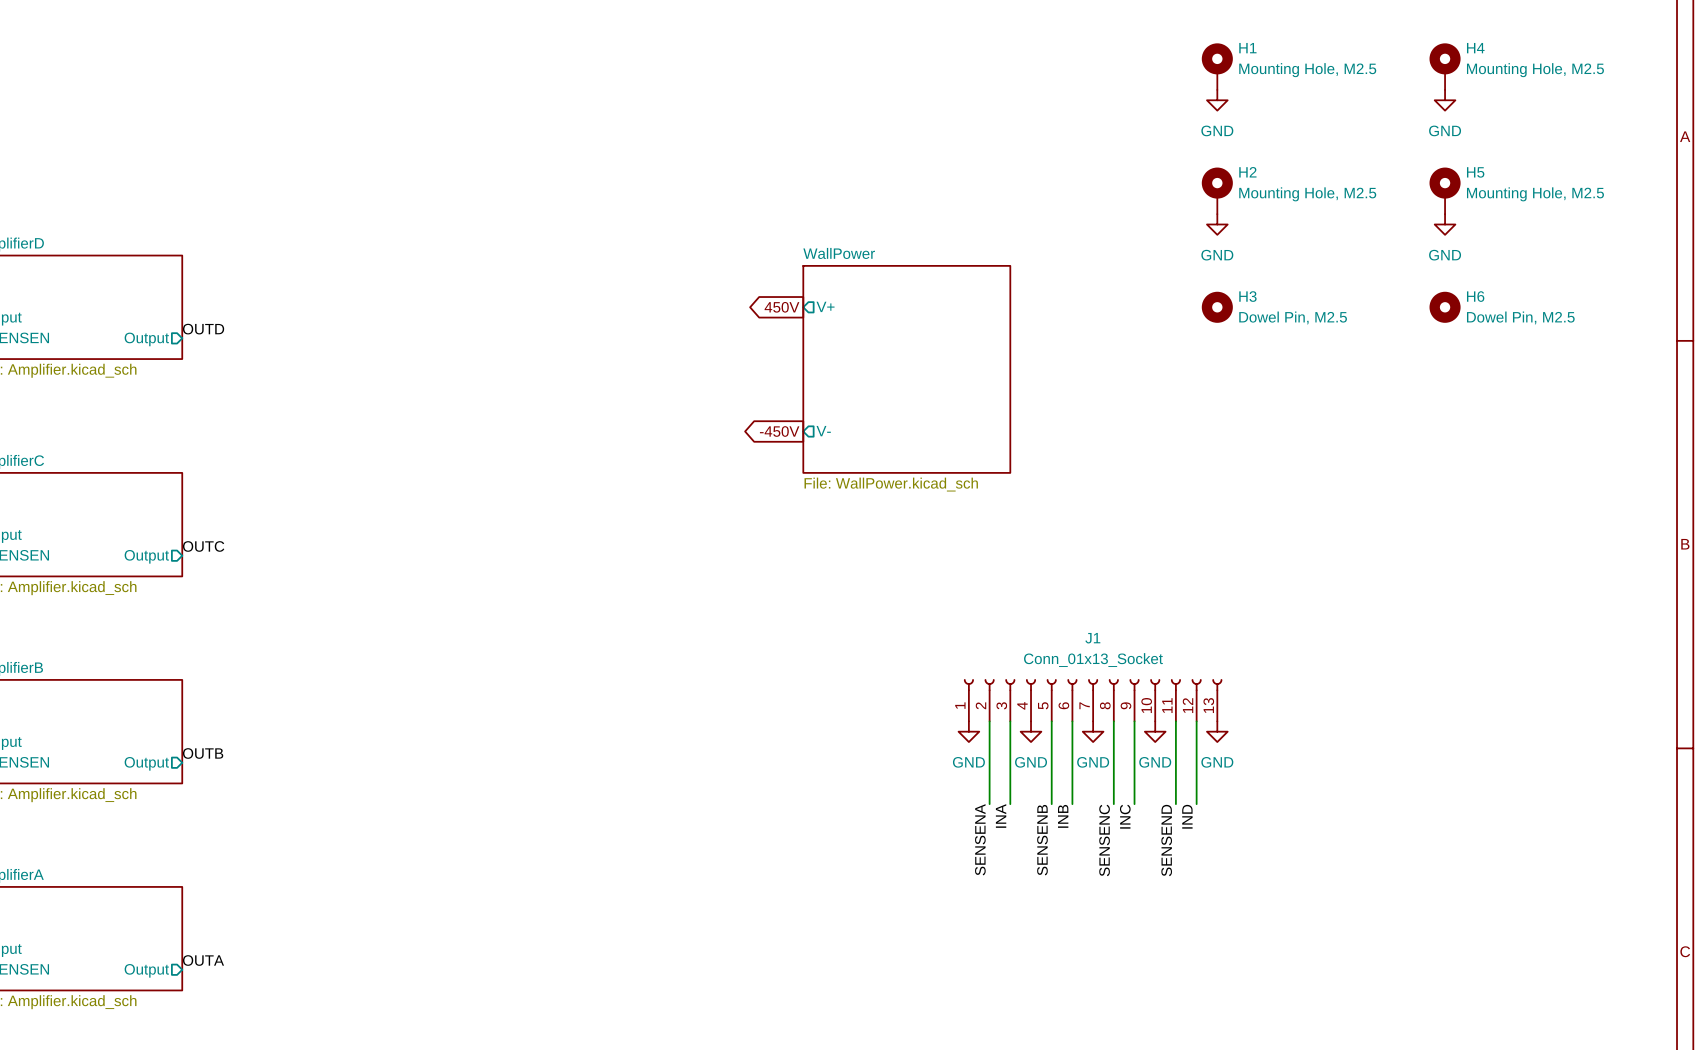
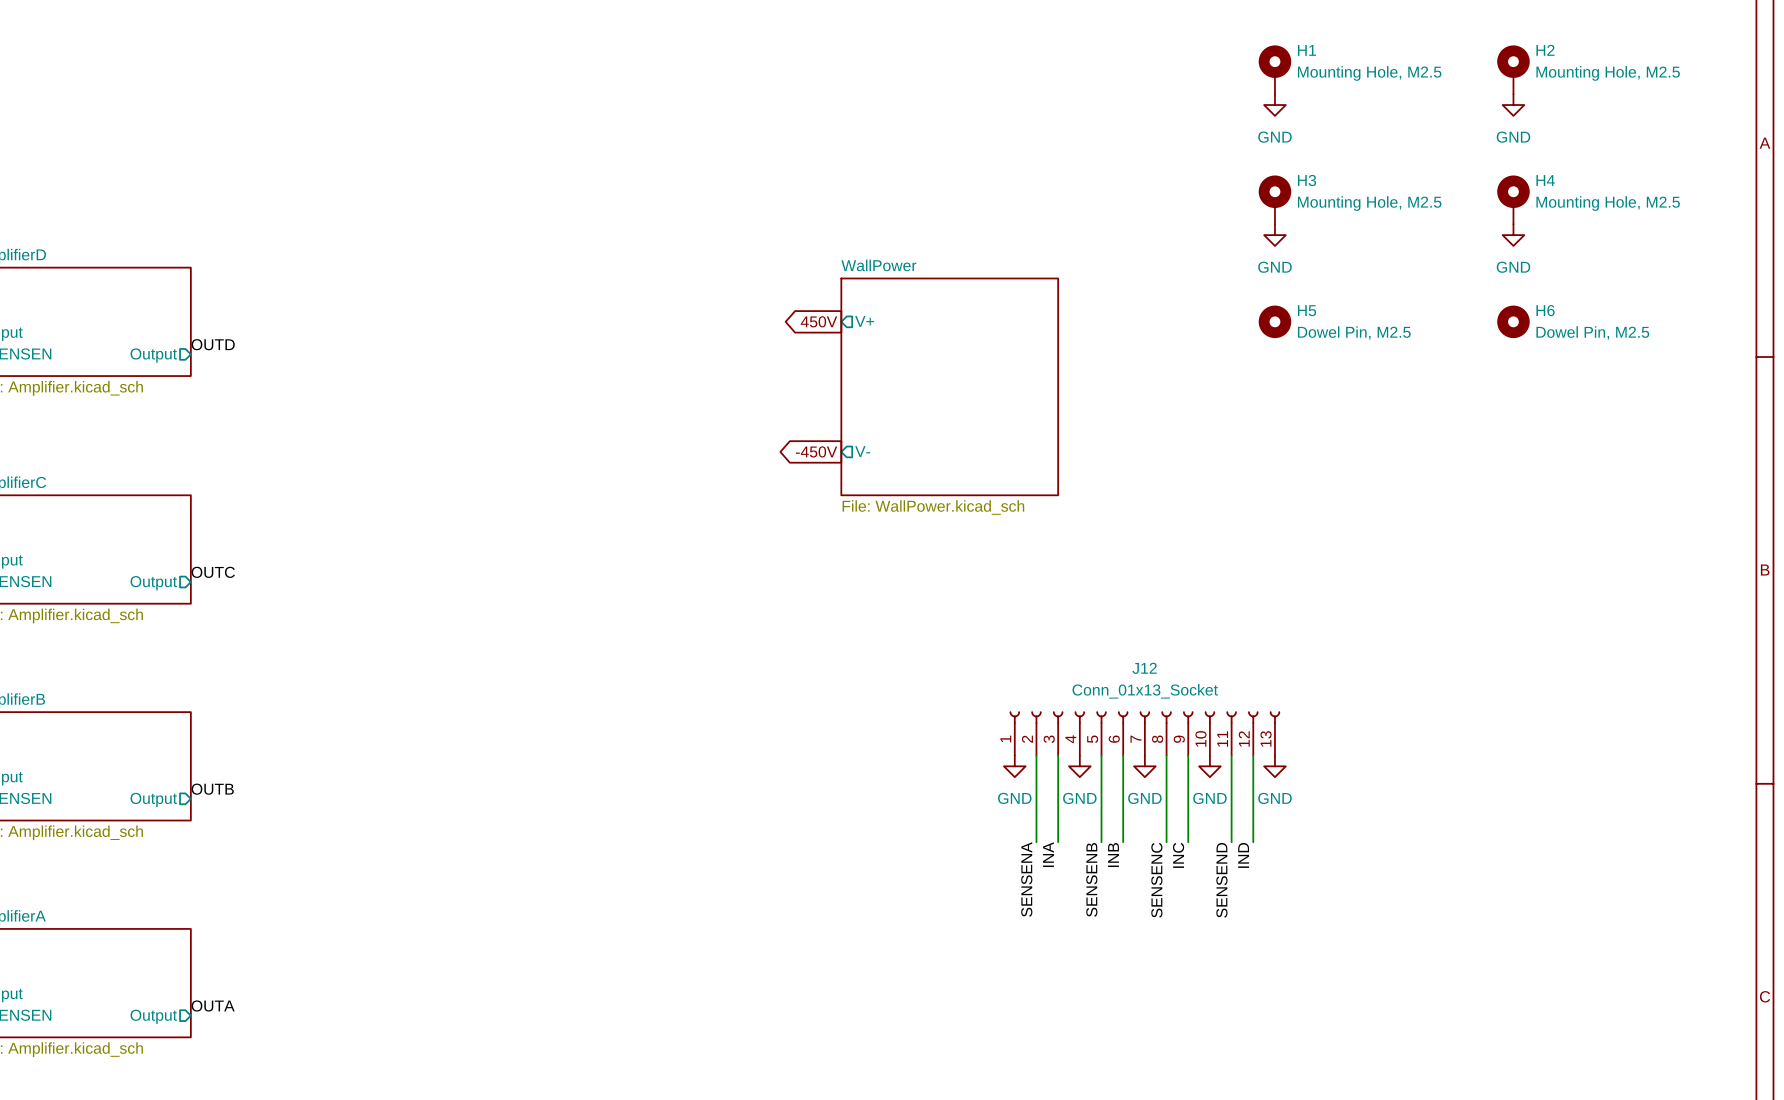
H4 name: H4 (1475, 48) -> H2 (1545, 50)
H2 name: H2 (1247, 172) -> H3 (1307, 180)
H5 name: H5 (1475, 172) -> H4 (1545, 180)
H3 name: H3 (1247, 296) -> H5 (1307, 310)
J1 name: J1 (1092, 638) -> J12 (1144, 668)

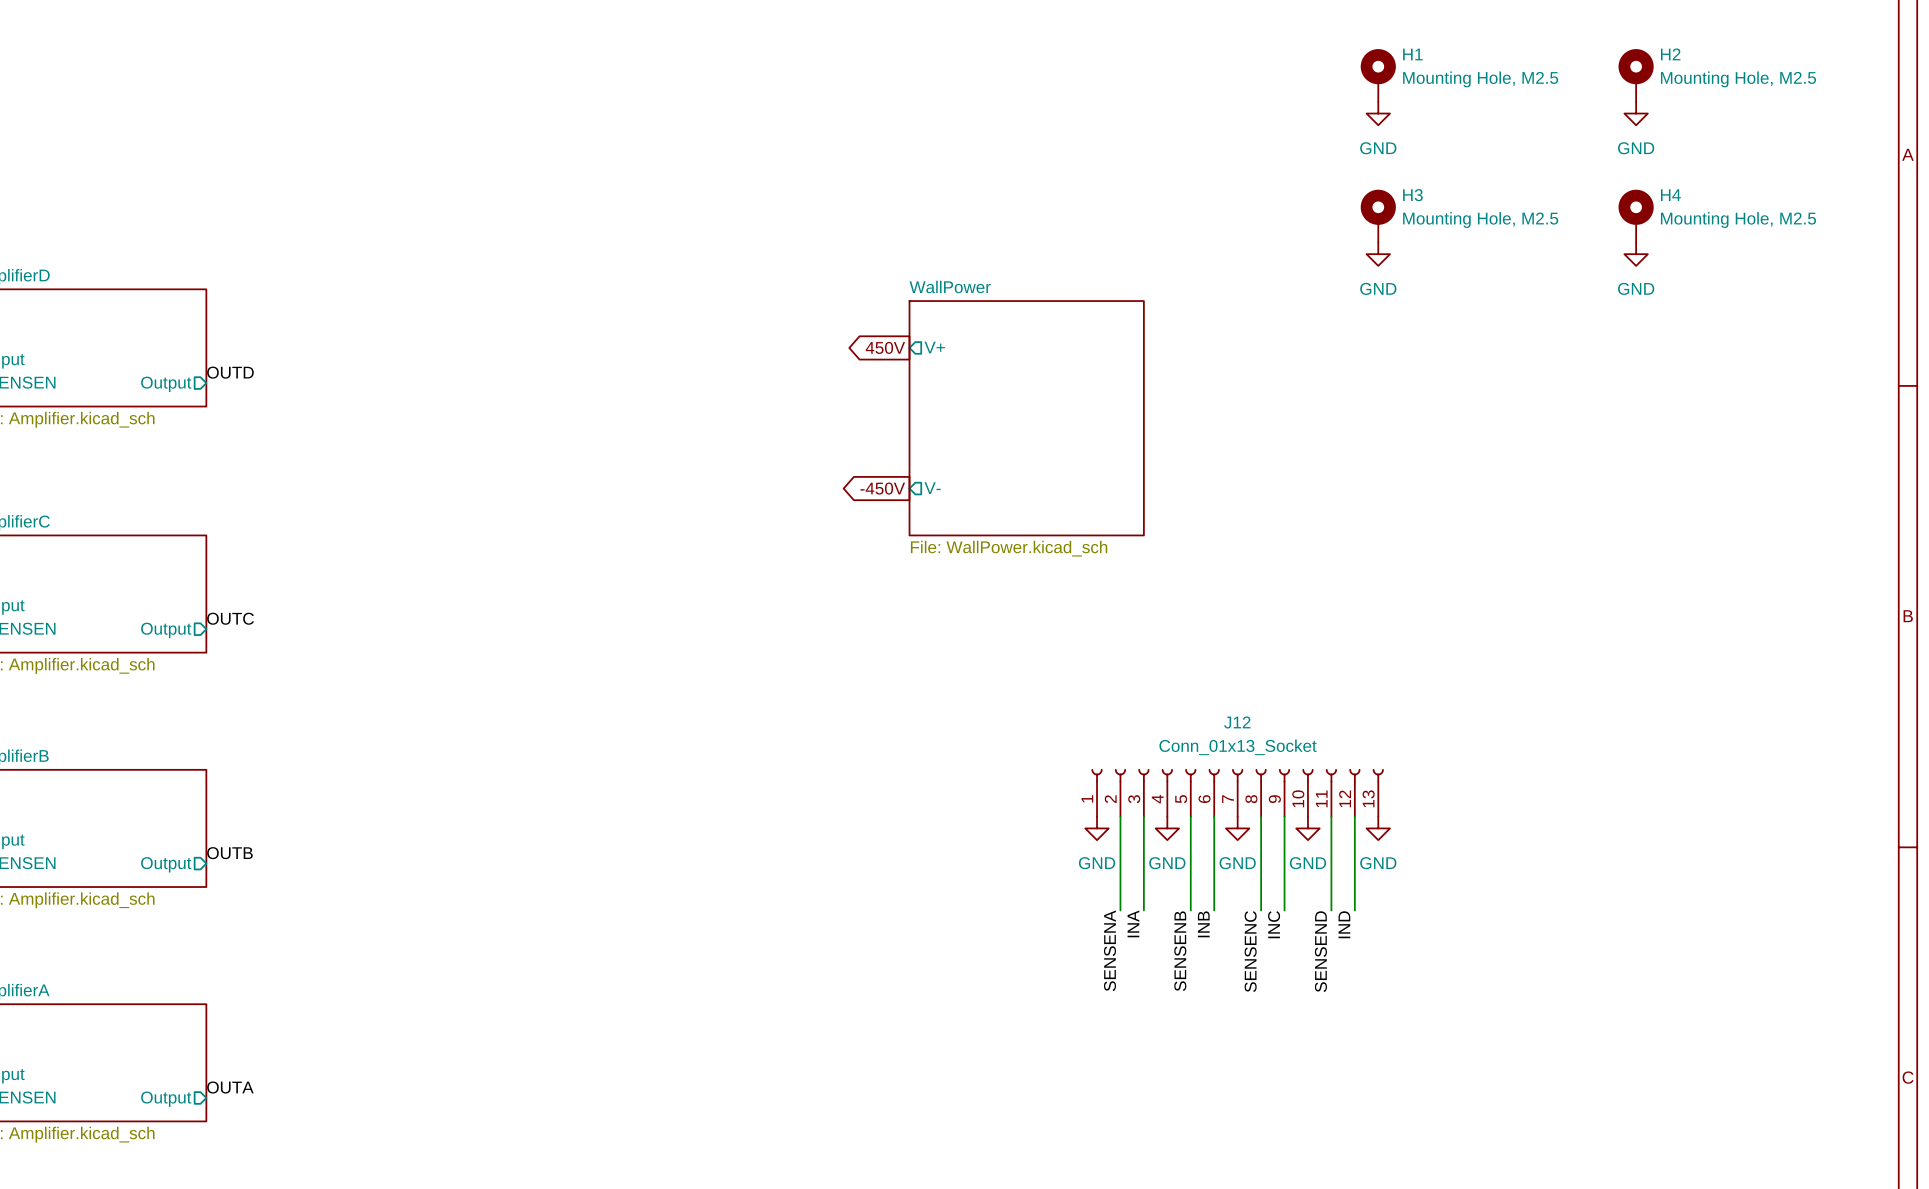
H5: Dowel Pin, M2.5 (1274, 321) -> none
H6: Dowel Pin, M2.5 (1513, 321) -> none

